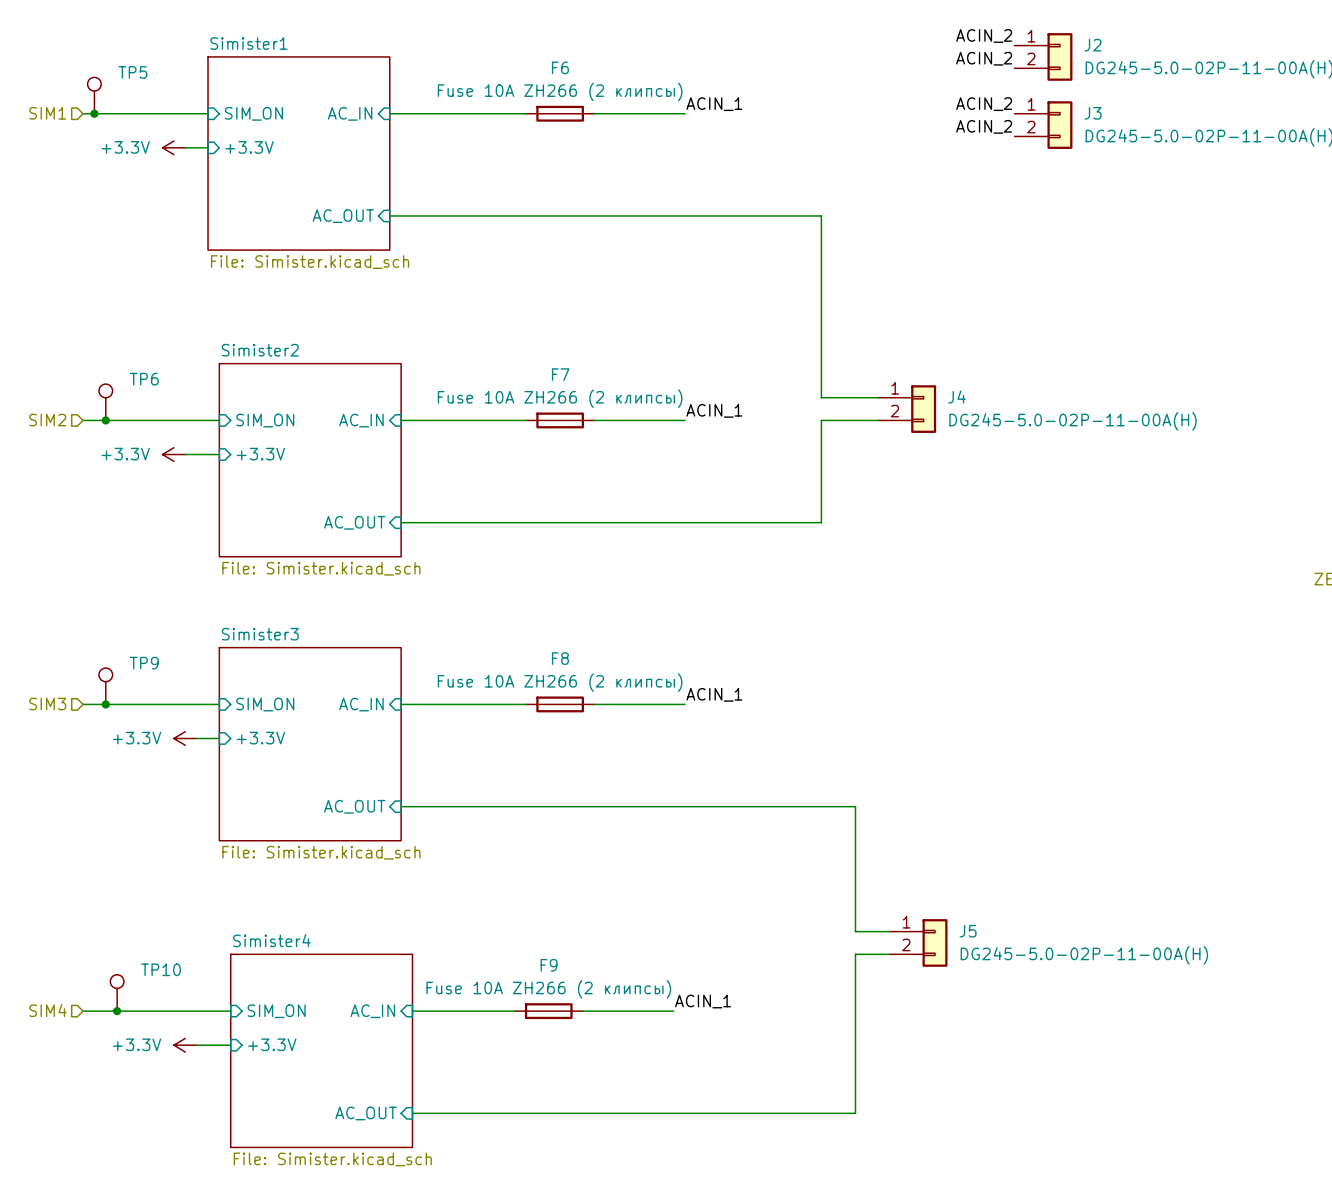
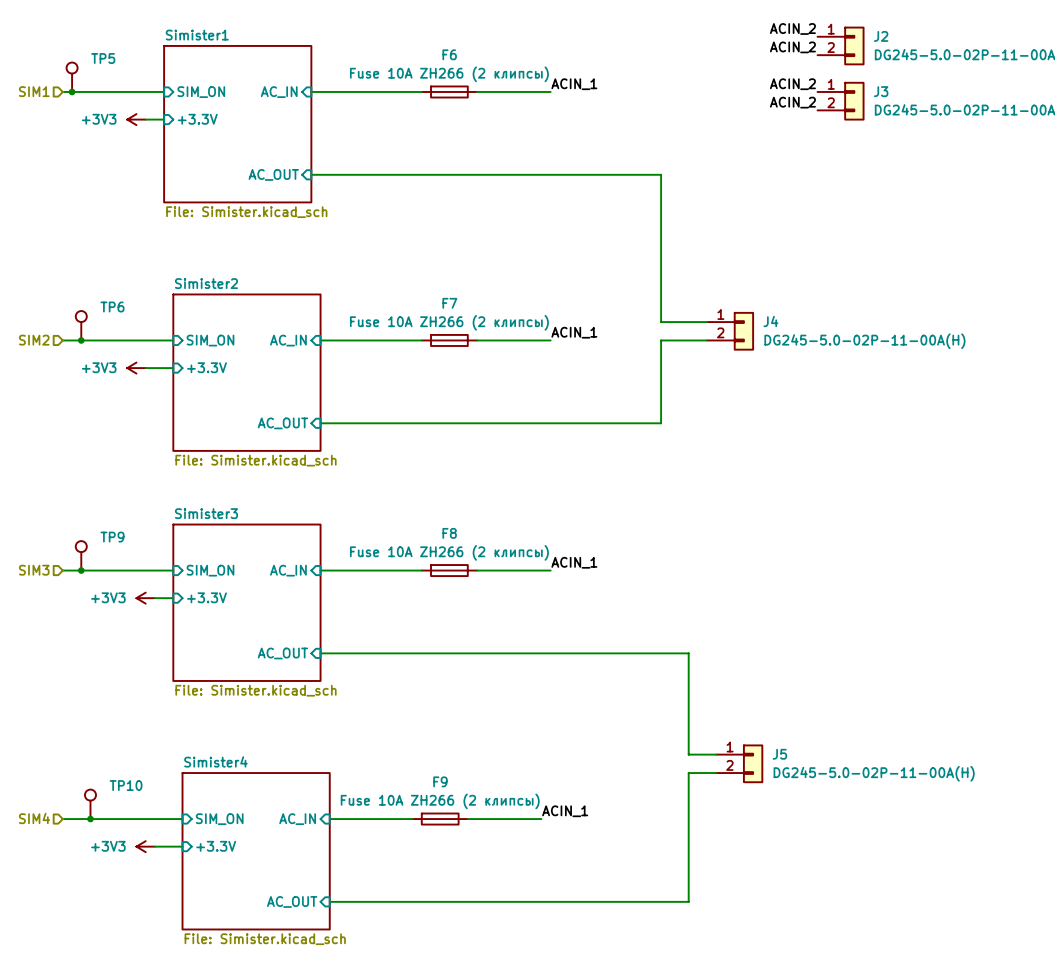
power symbol: +3.3V (173, 147) -> +3V3 (136, 119)
power symbol: +3.3V (173, 454) -> +3V3 (136, 368)
power symbol: +3.3V (185, 738) -> +3V3 (145, 598)
power symbol: +3.3V (185, 1045) -> +3V3 (145, 846)

